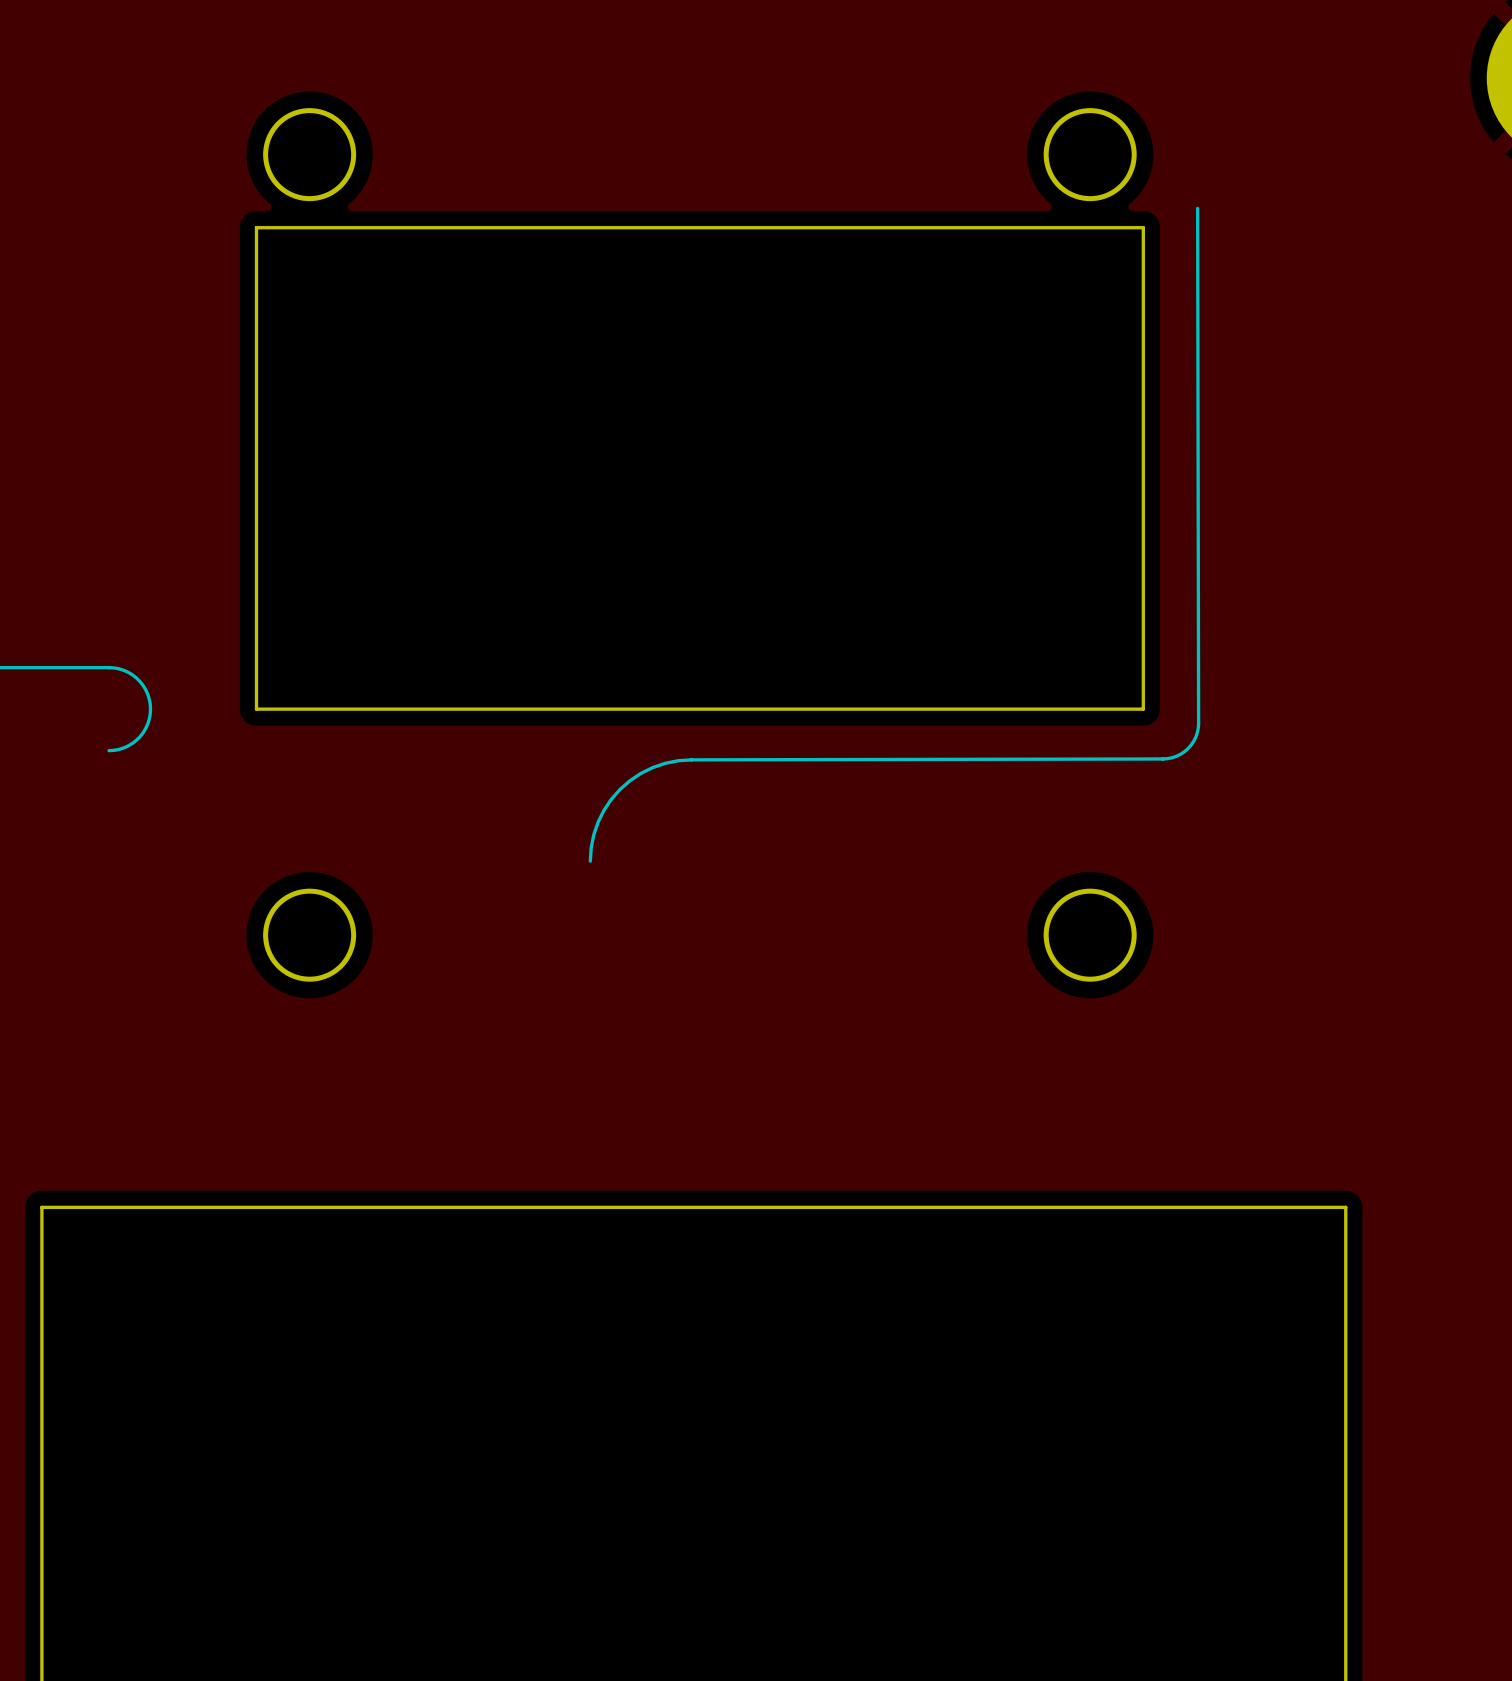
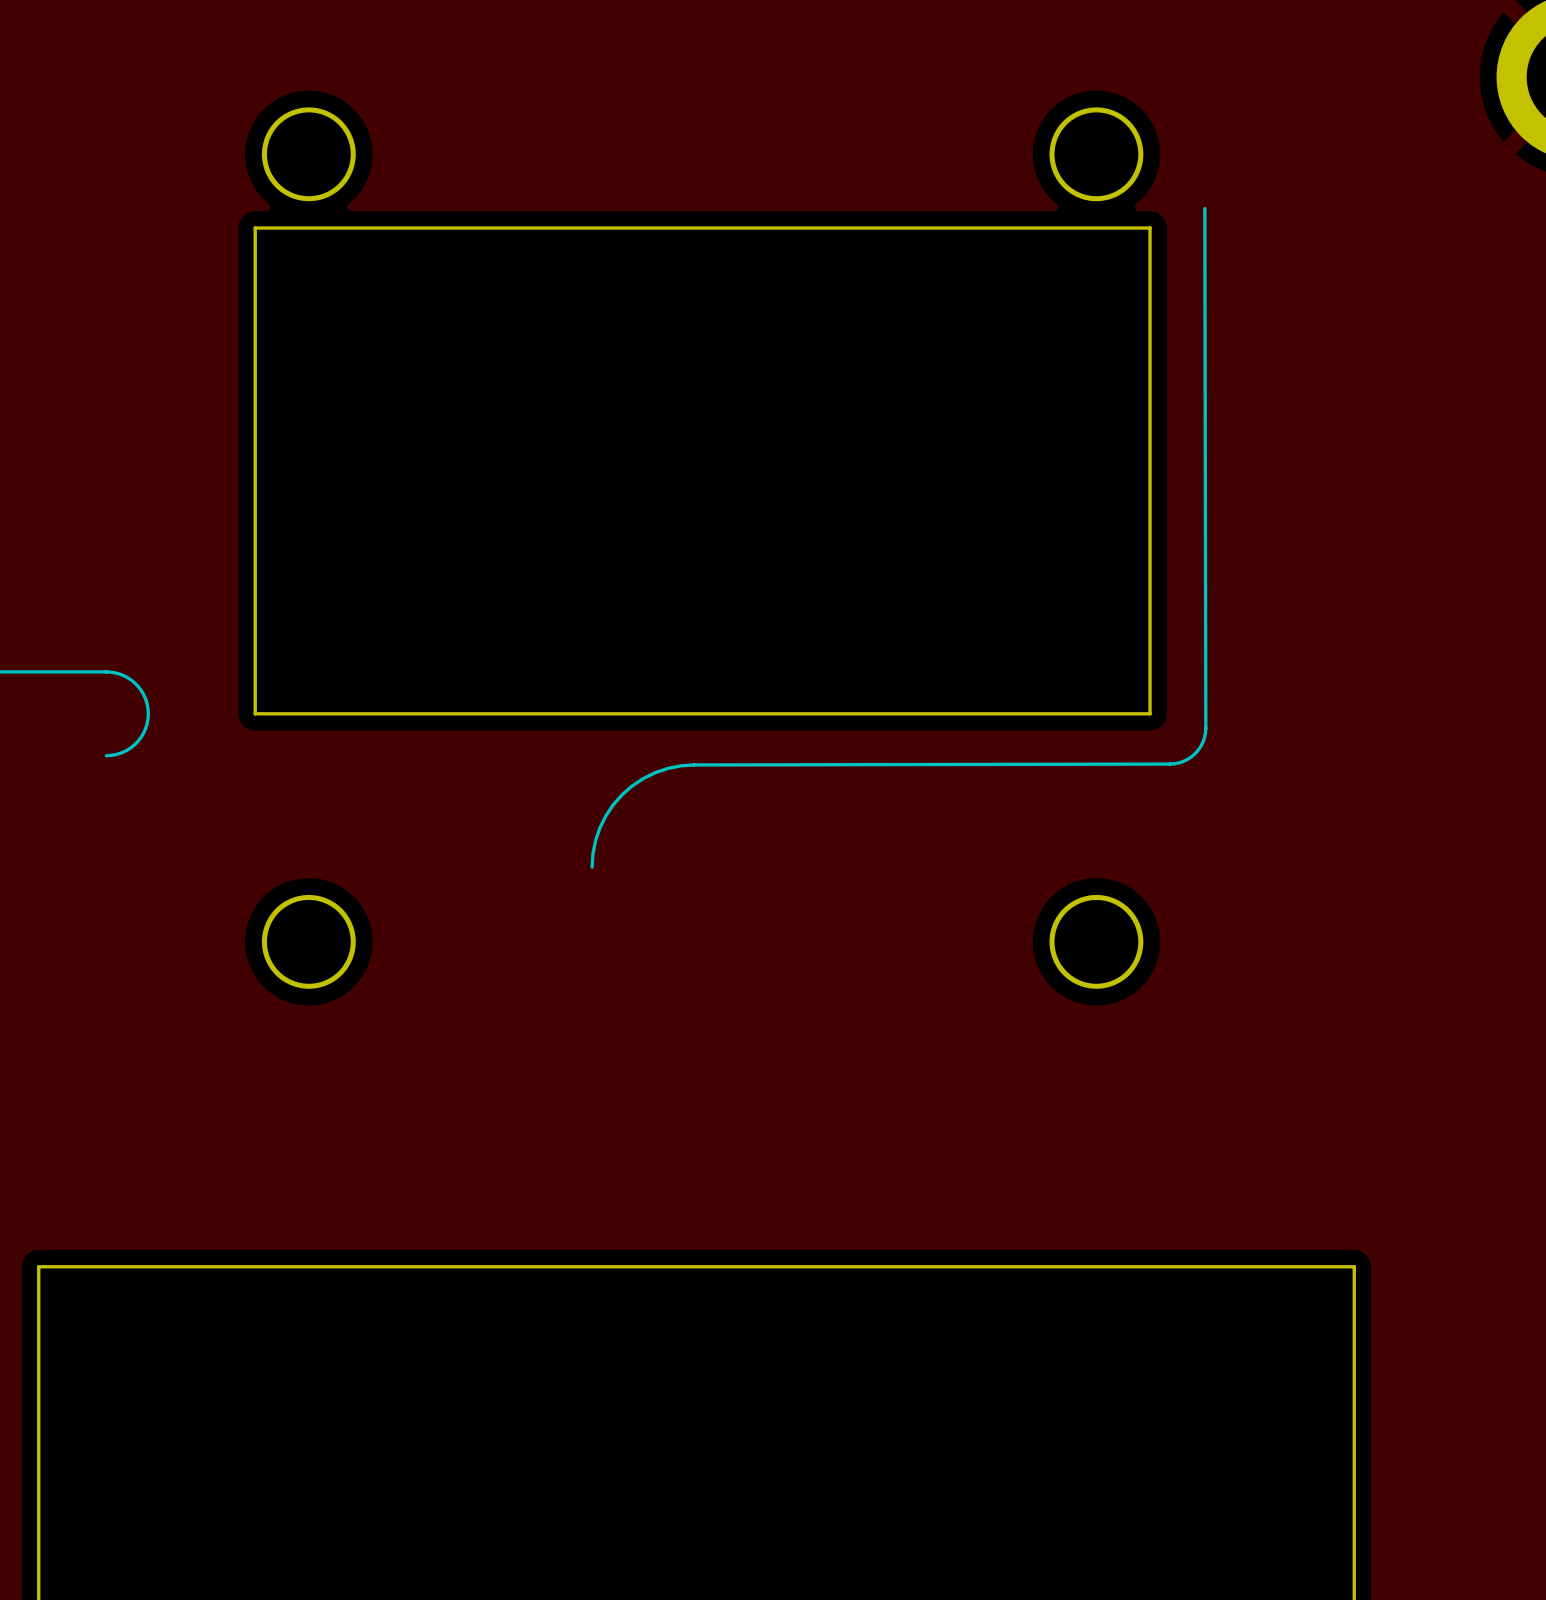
board edge: (41, 1257) (41, 1207) (1345, 1207) (1345, 1257) -> (38, 1266) (1354, 1266)

